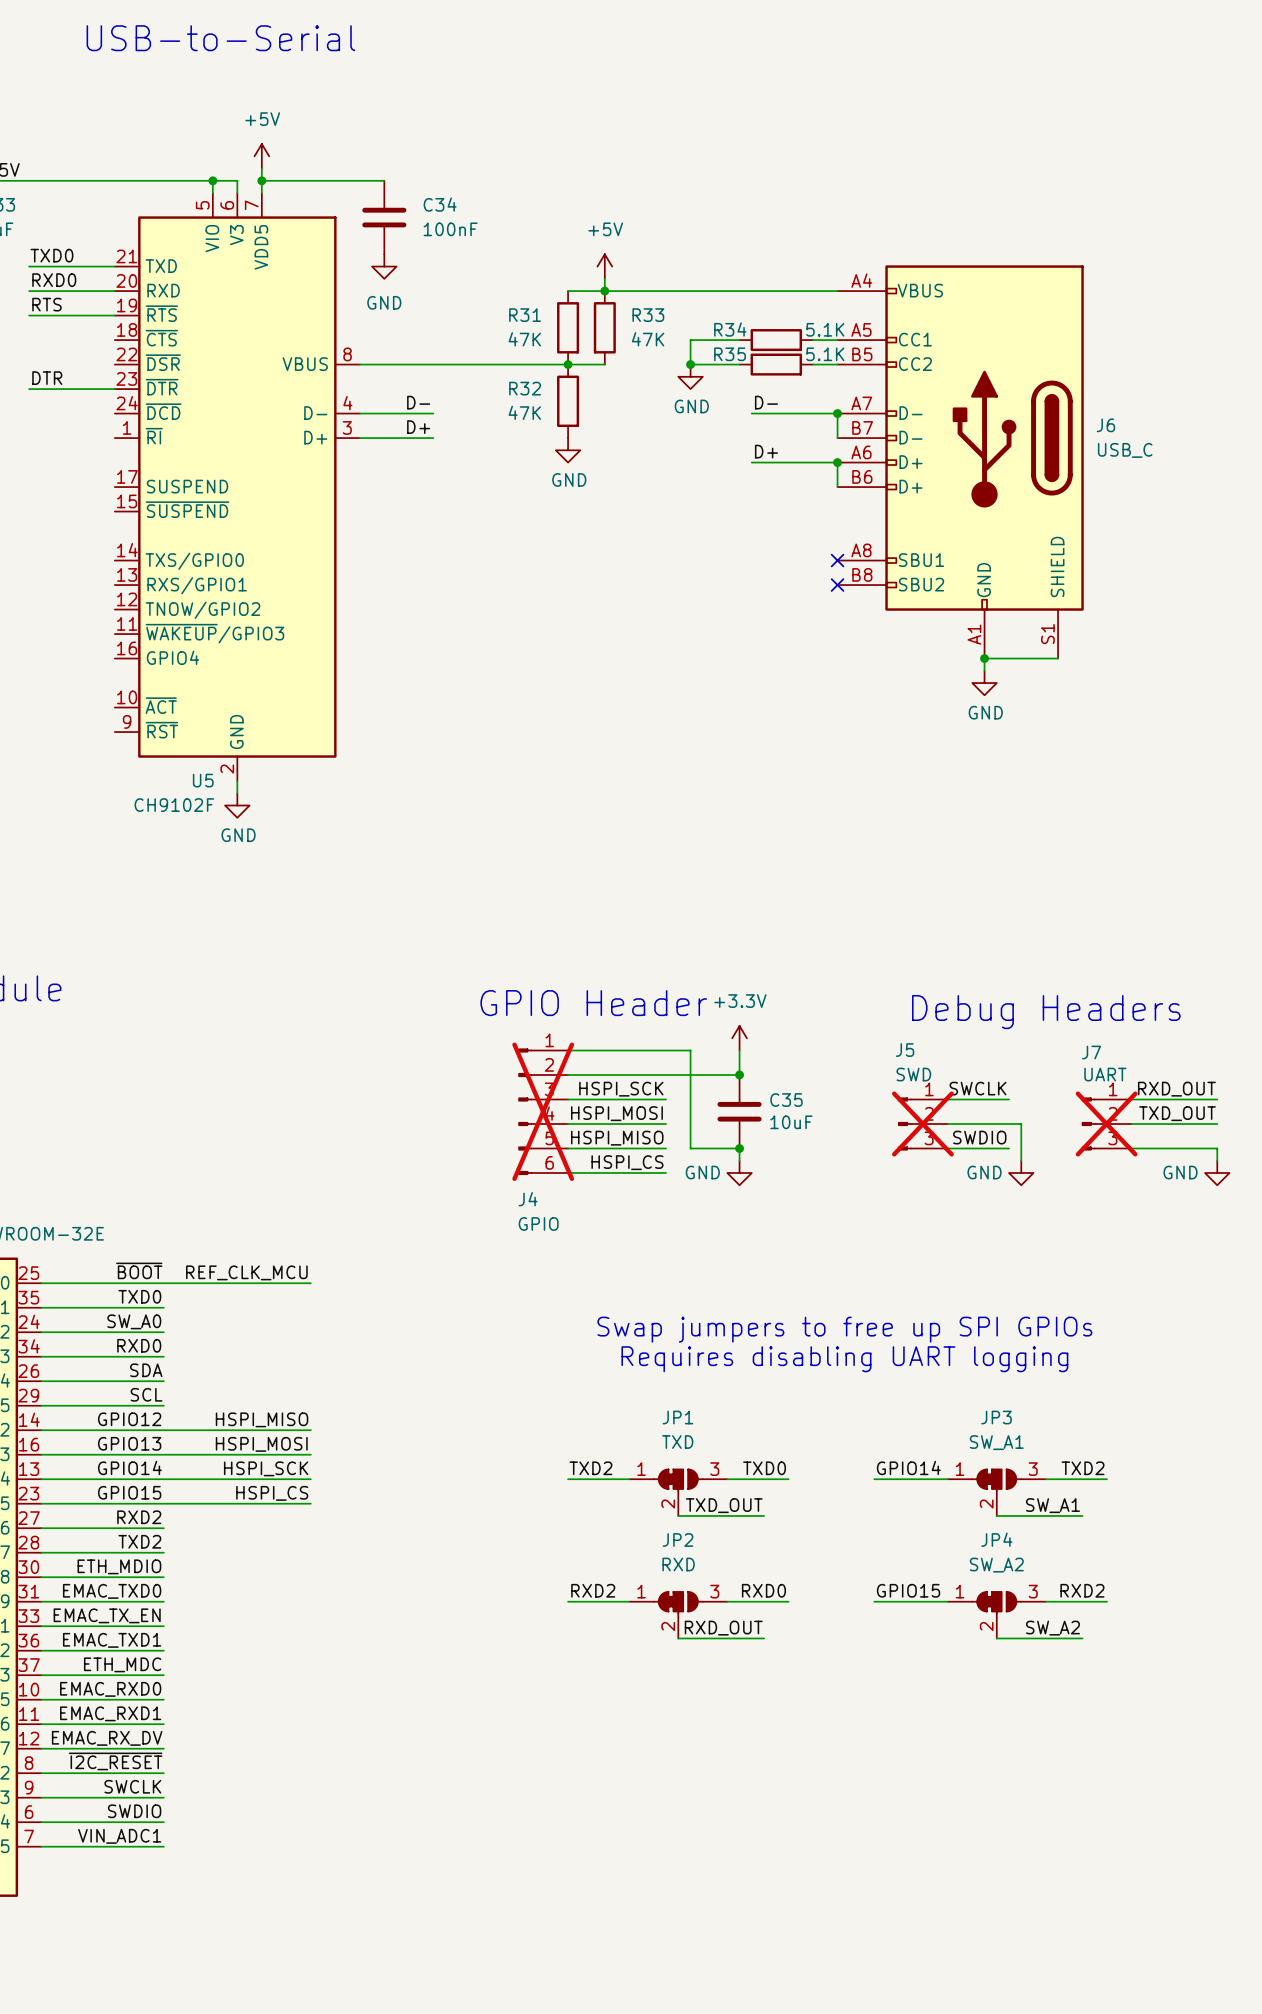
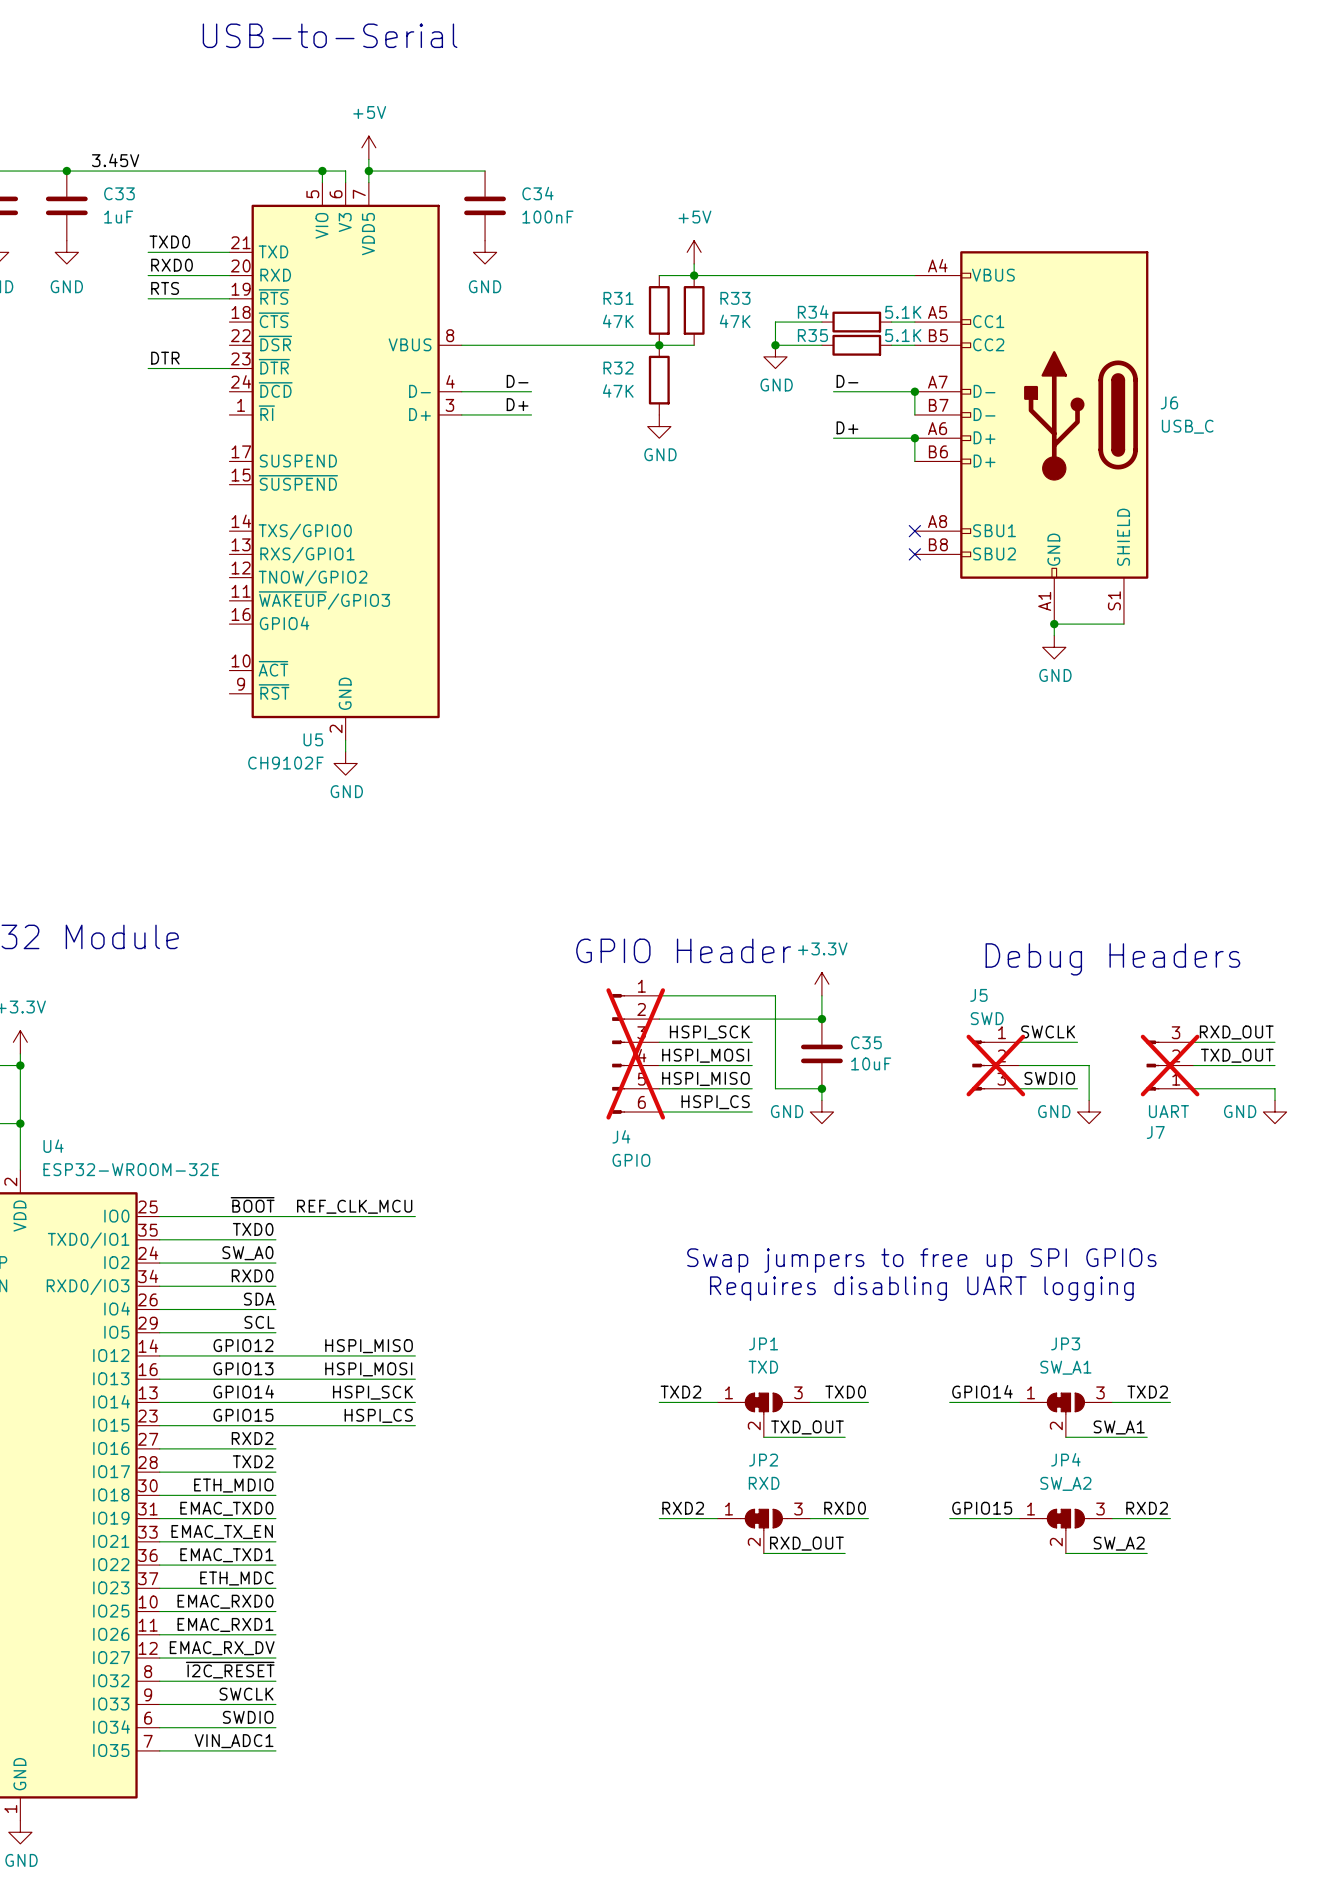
J7 flip: as is (1088, 1124) -> up-down (1153, 1065)

